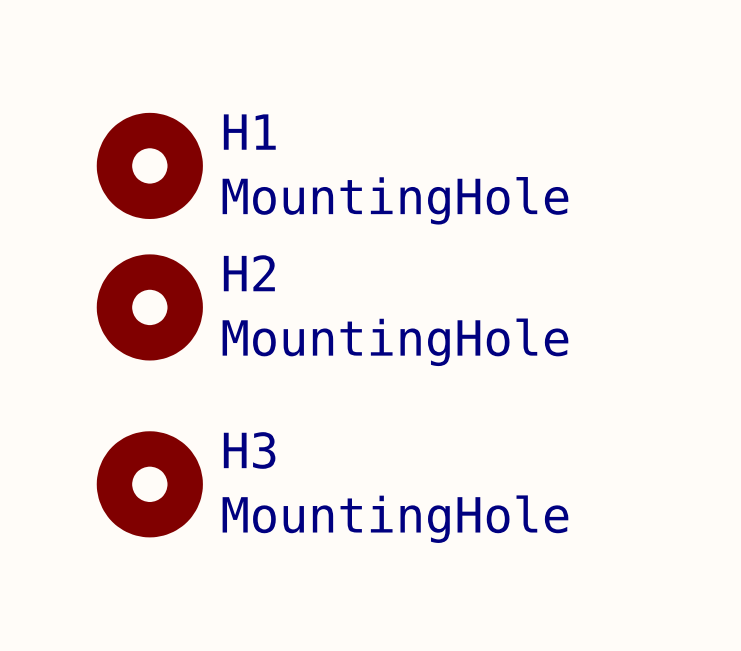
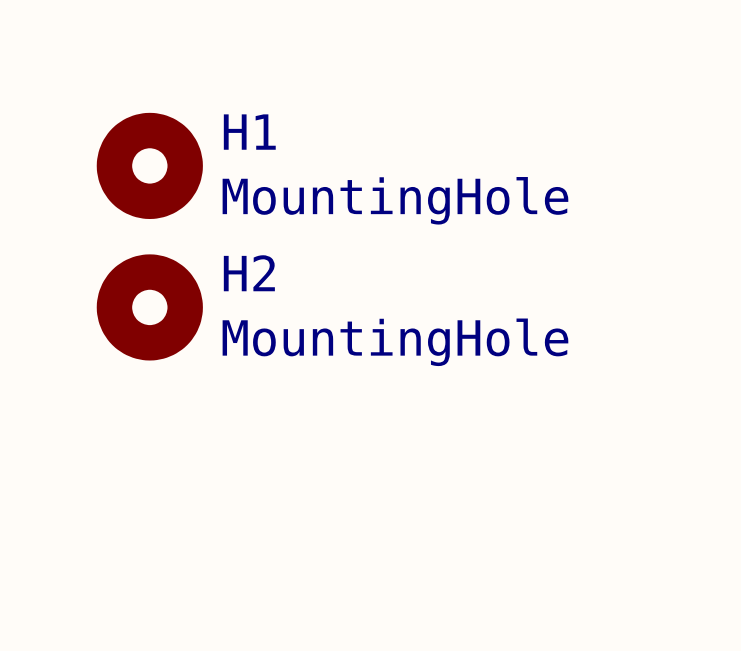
H3: MountingHole (149, 484) -> none

